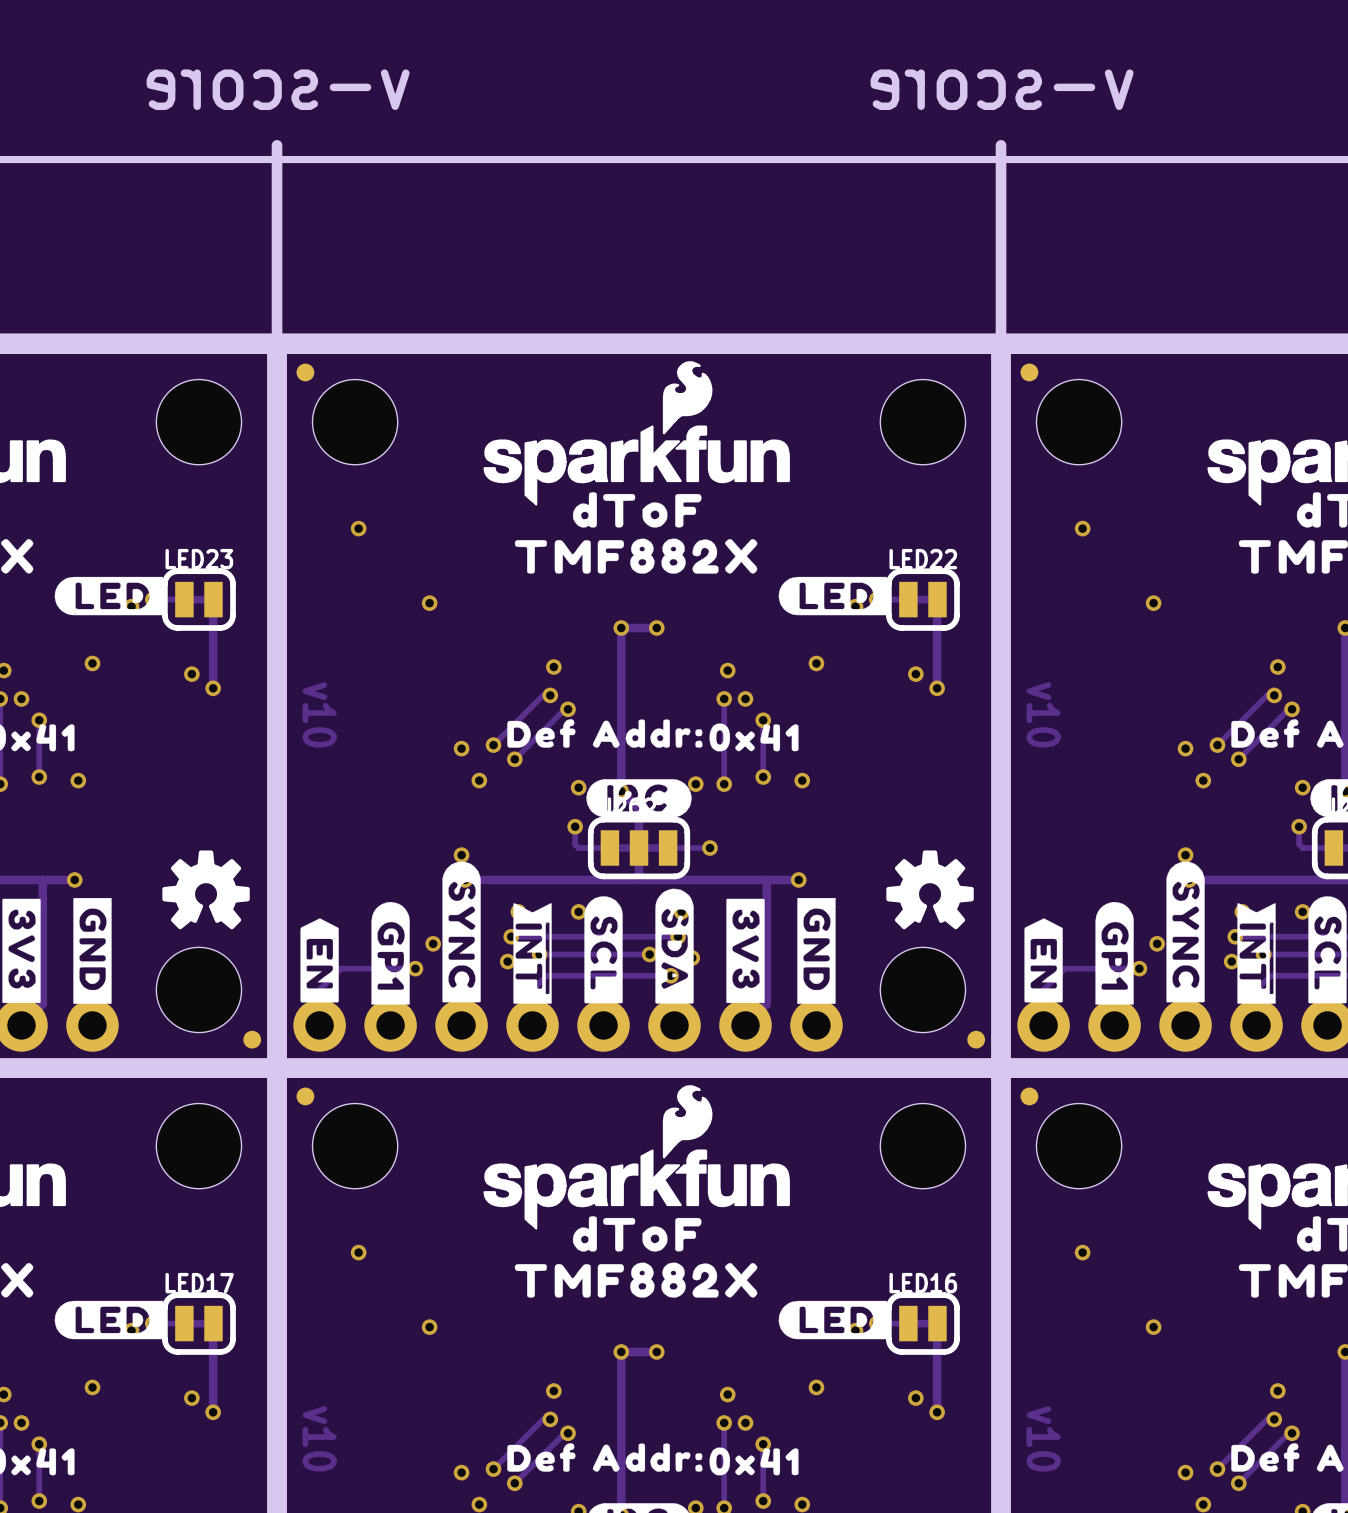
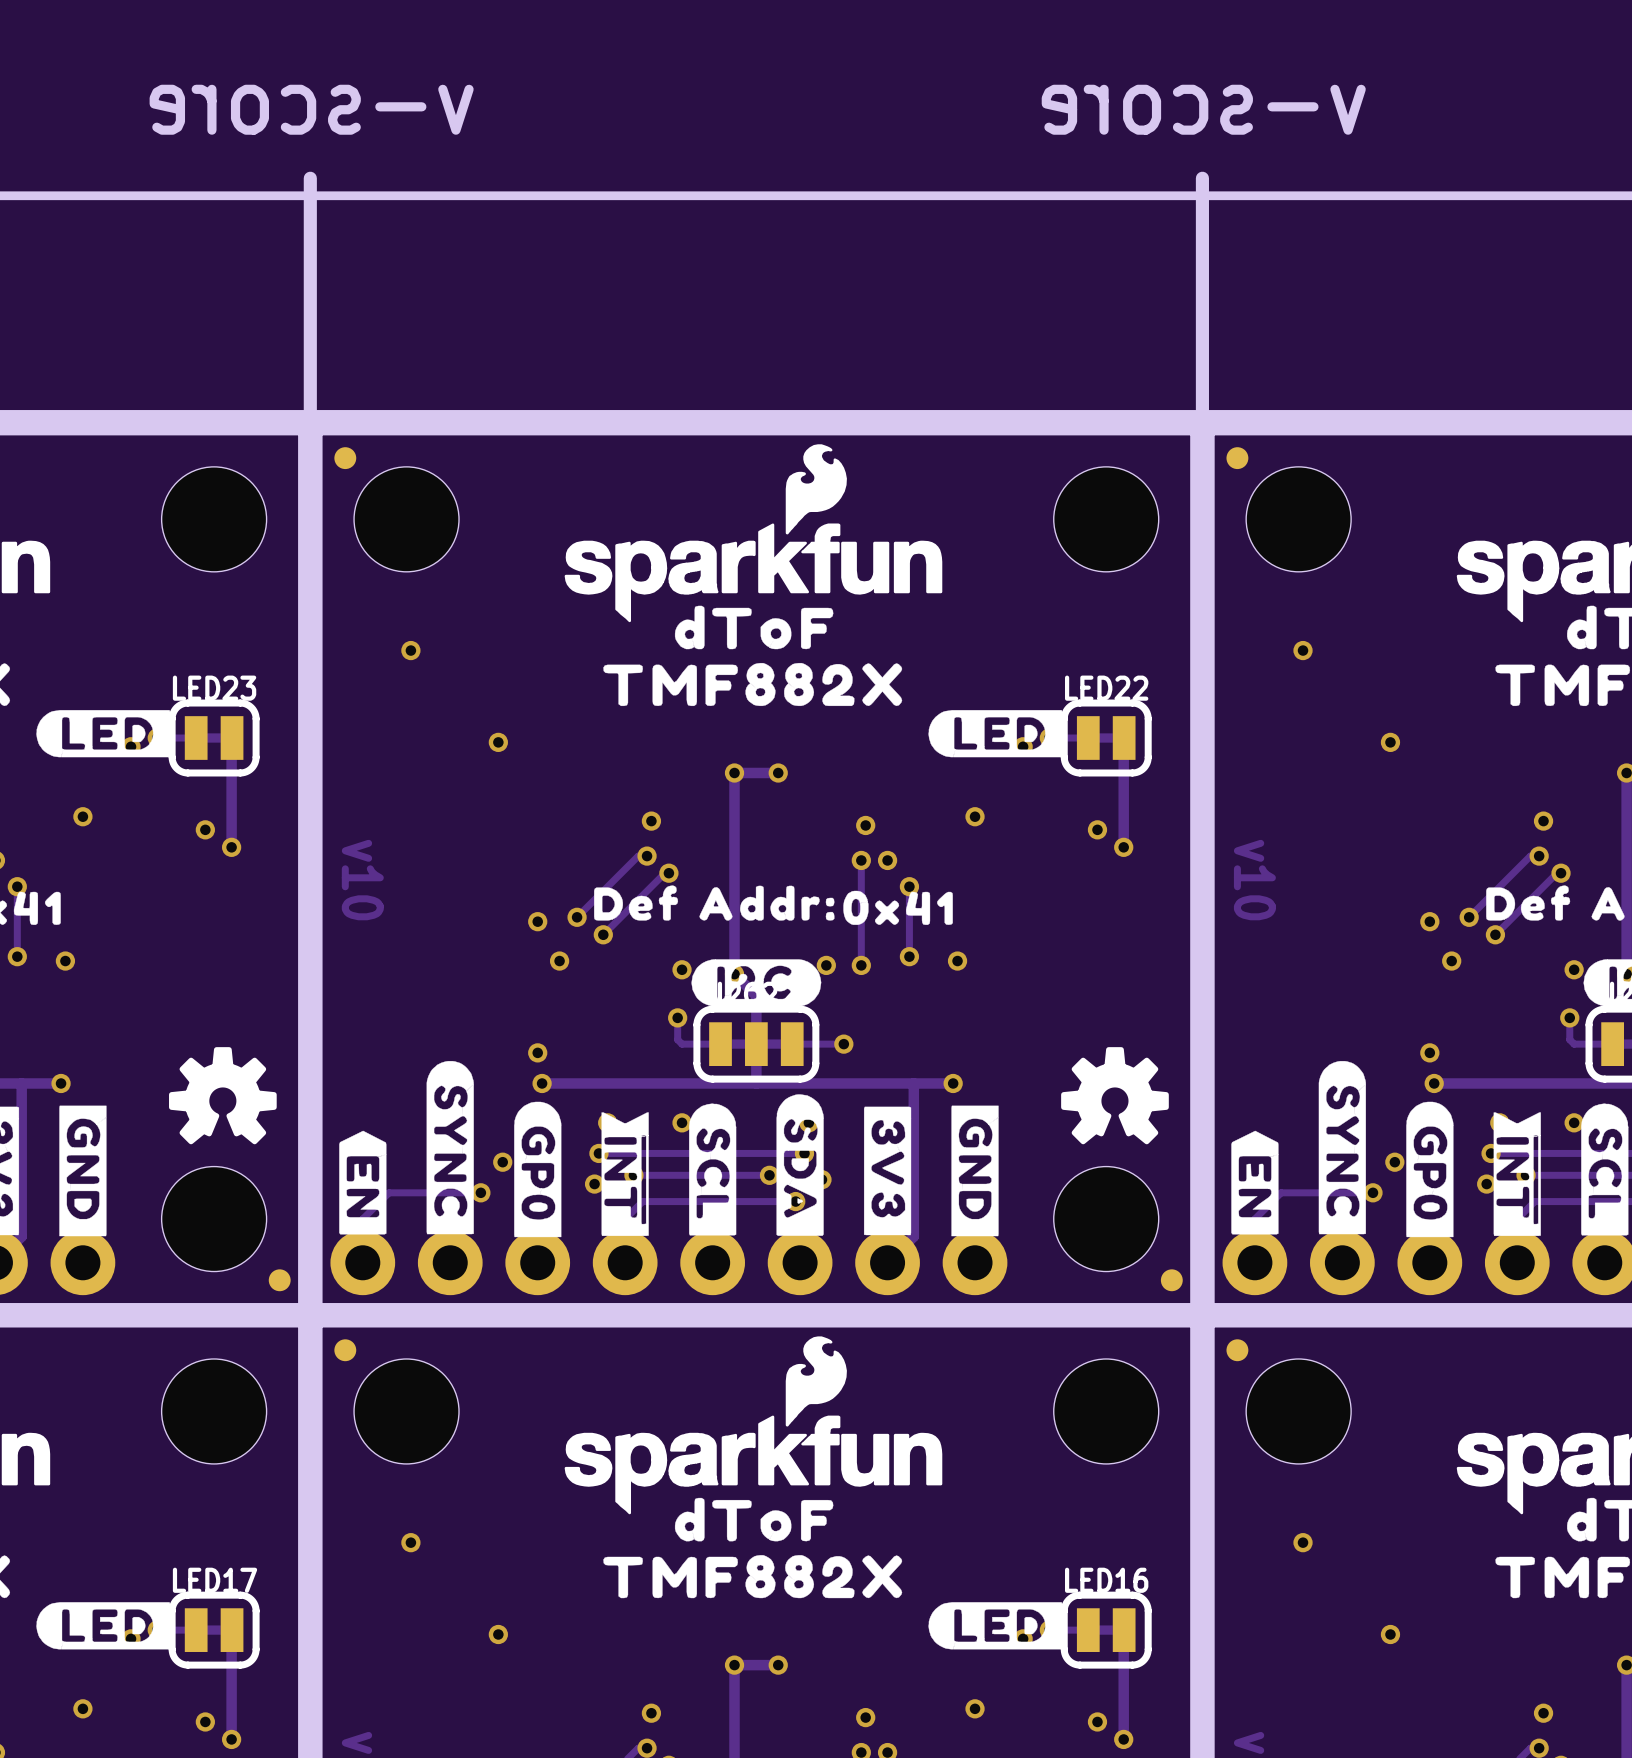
drawing: none -> [514, 1101, 562, 1238]
drawing: none -> [1406, 1101, 1454, 1238]
drawing: [371, 902, 410, 1005] -> none
drawing: [1095, 902, 1134, 1005] -> none
drawing position: (461, 931) -> (450, 1147)
drawing position: (1185, 931) -> (1342, 1147)

